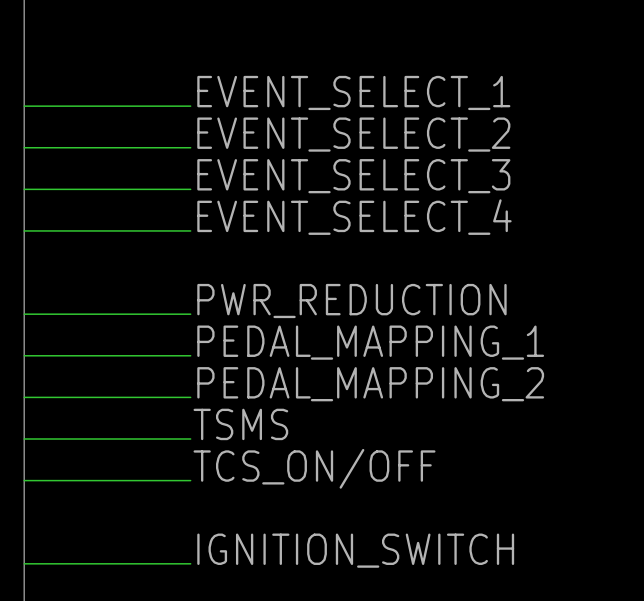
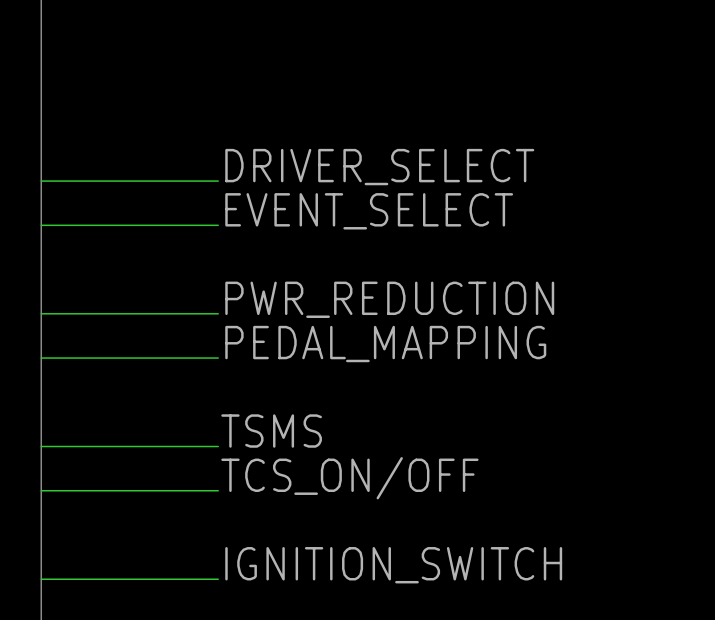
label: EVENT_SELECT_1 (353, 92) -> none
wire: (24, 106) (190, 106) -> none
label: EVENT_SELECT_2 (353, 134) -> none
wire: (24, 147) (190, 147) -> none
label: EVENT_SELECT_3 (353, 176) -> DRIVER_SELECT (379, 167)
label: EVENT_SELECT_4 (354, 217) -> EVENT_SELECT (369, 211)
label: PEDAL_MAPPING_1 (370, 342) -> PEDAL_MAPPING (385, 344)
label: PEDAL_MAPPING_2 (370, 384) -> none
wire: (24, 397) (190, 397) -> none

